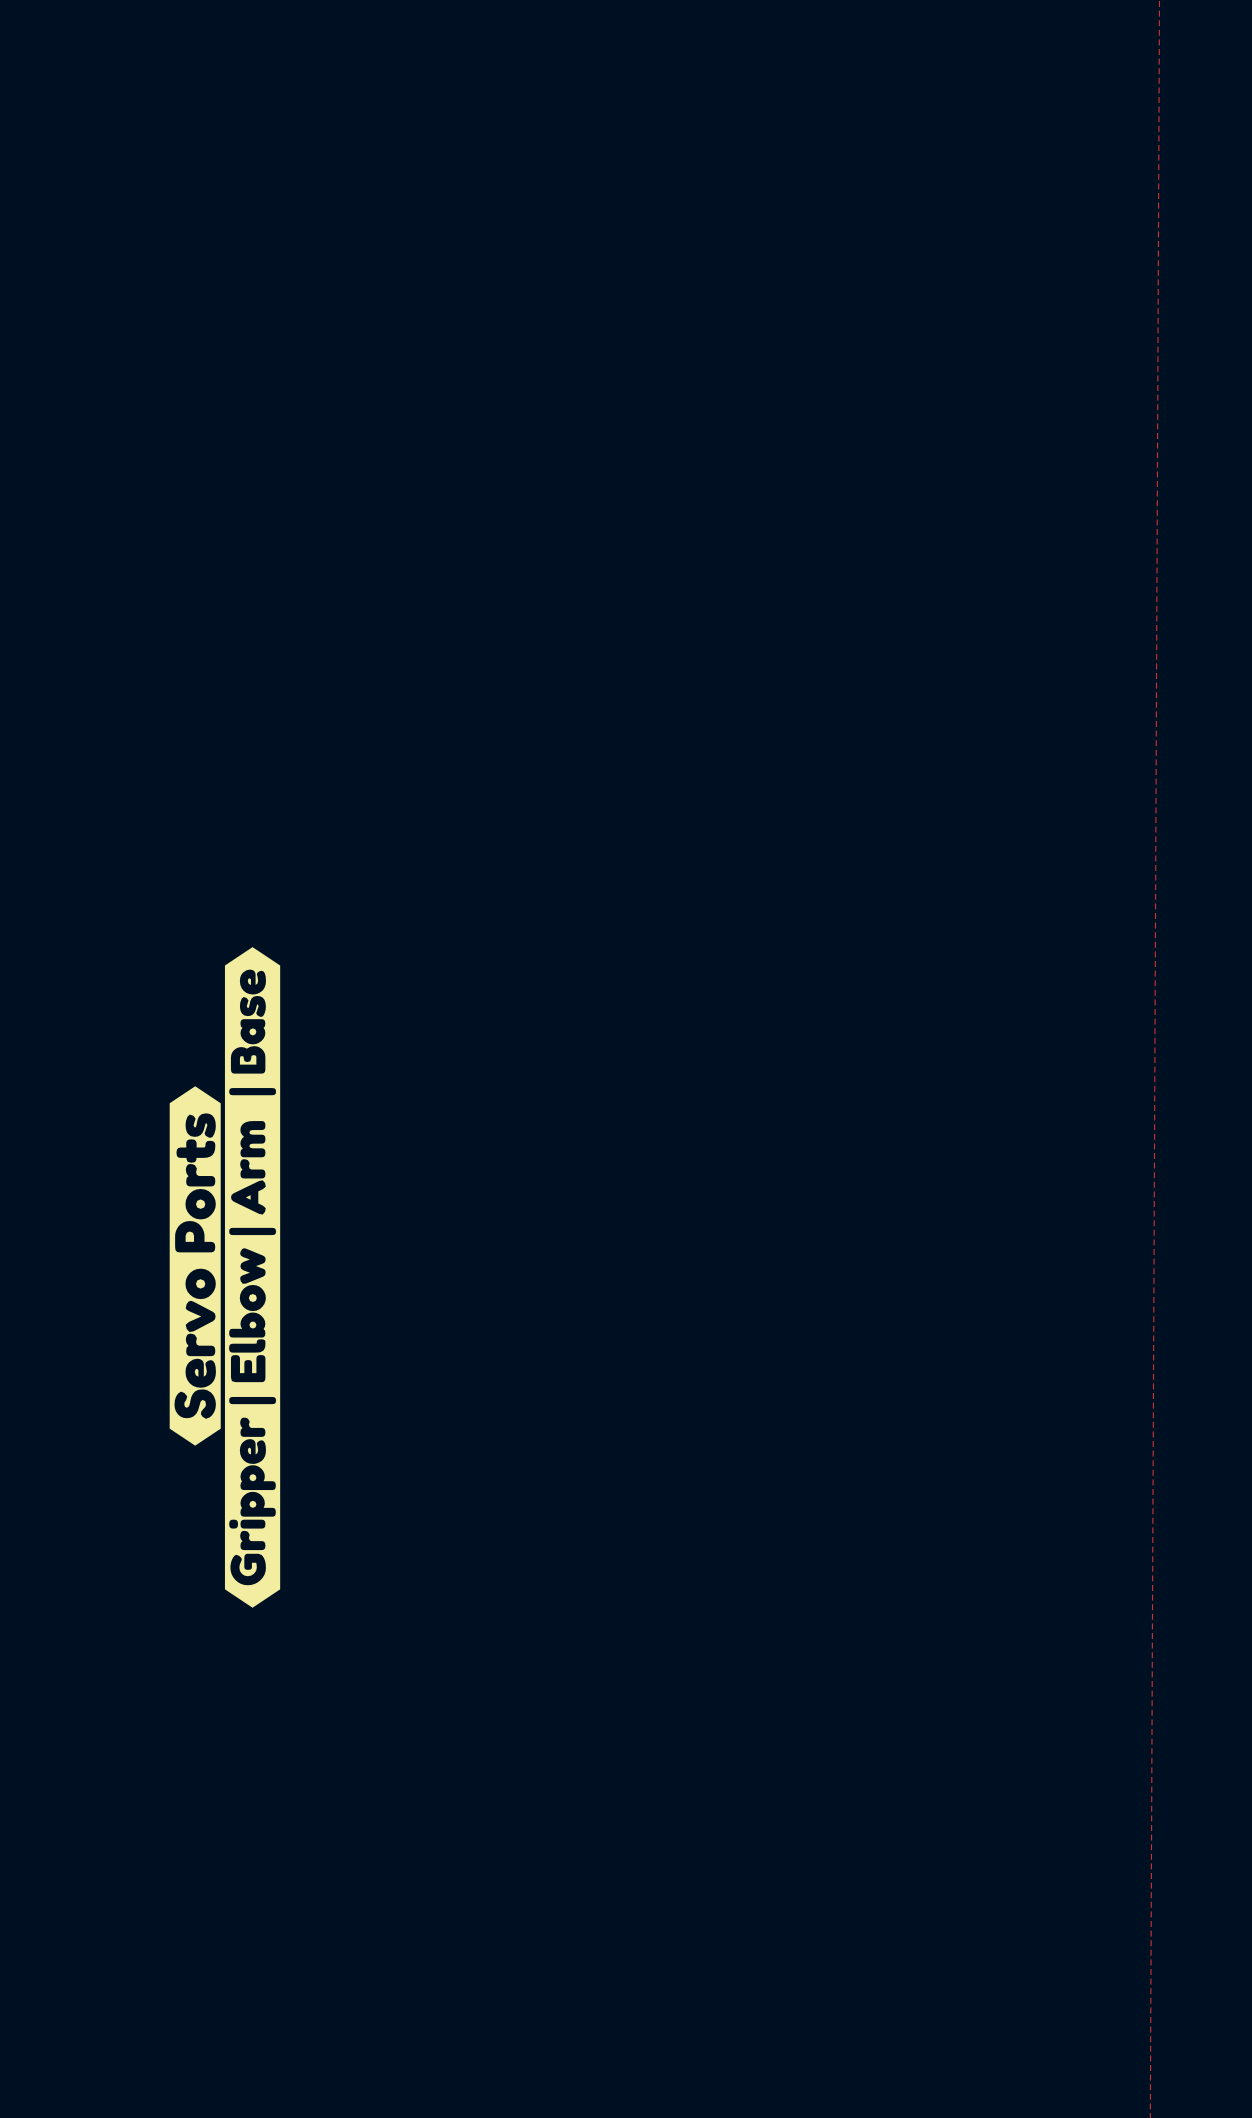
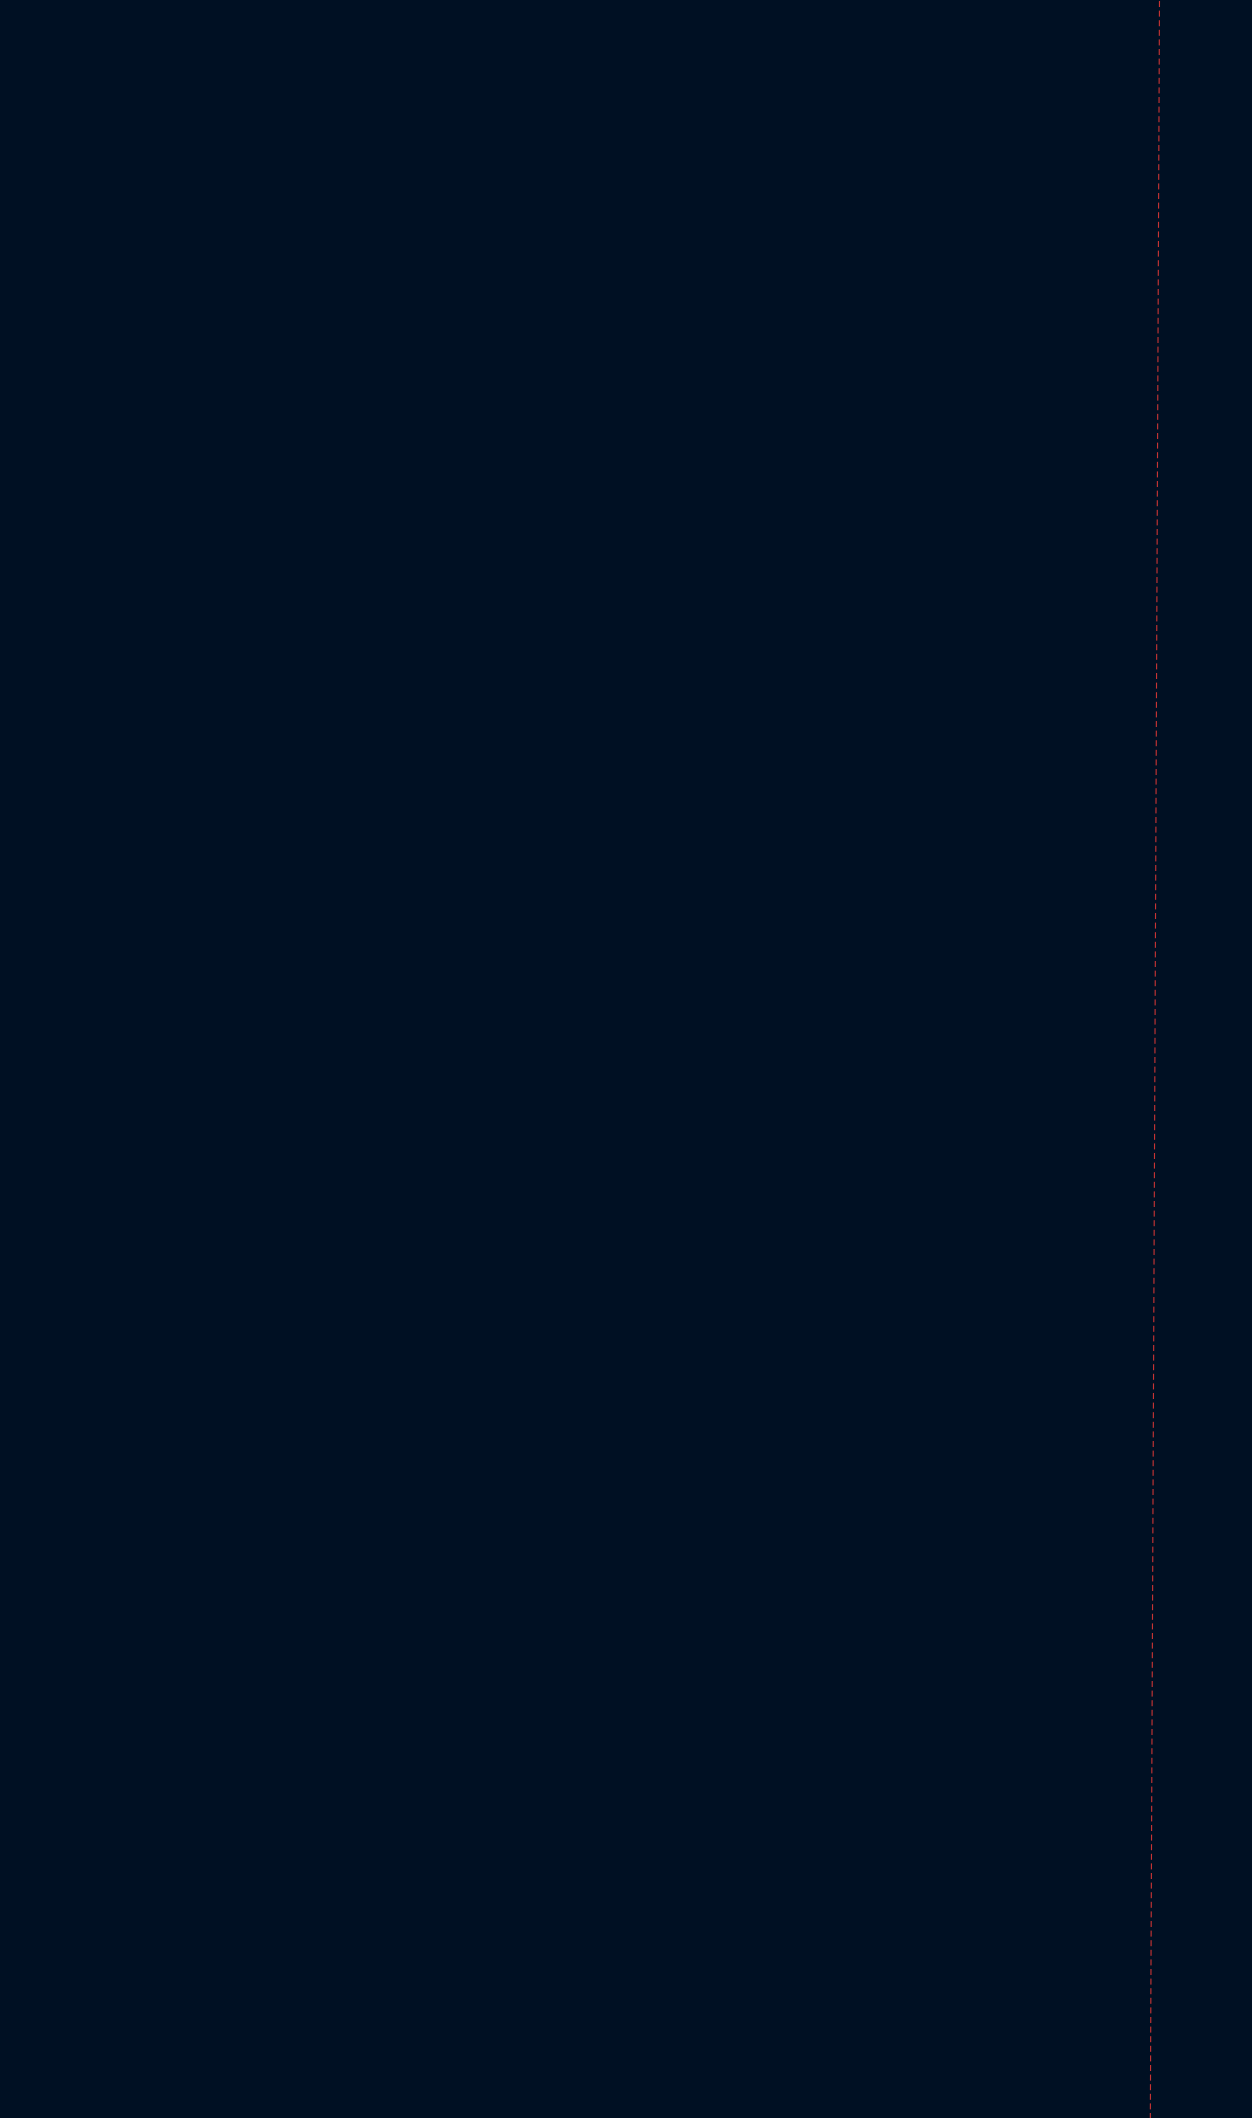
drawing: [169, 947, 281, 1608] -> none

